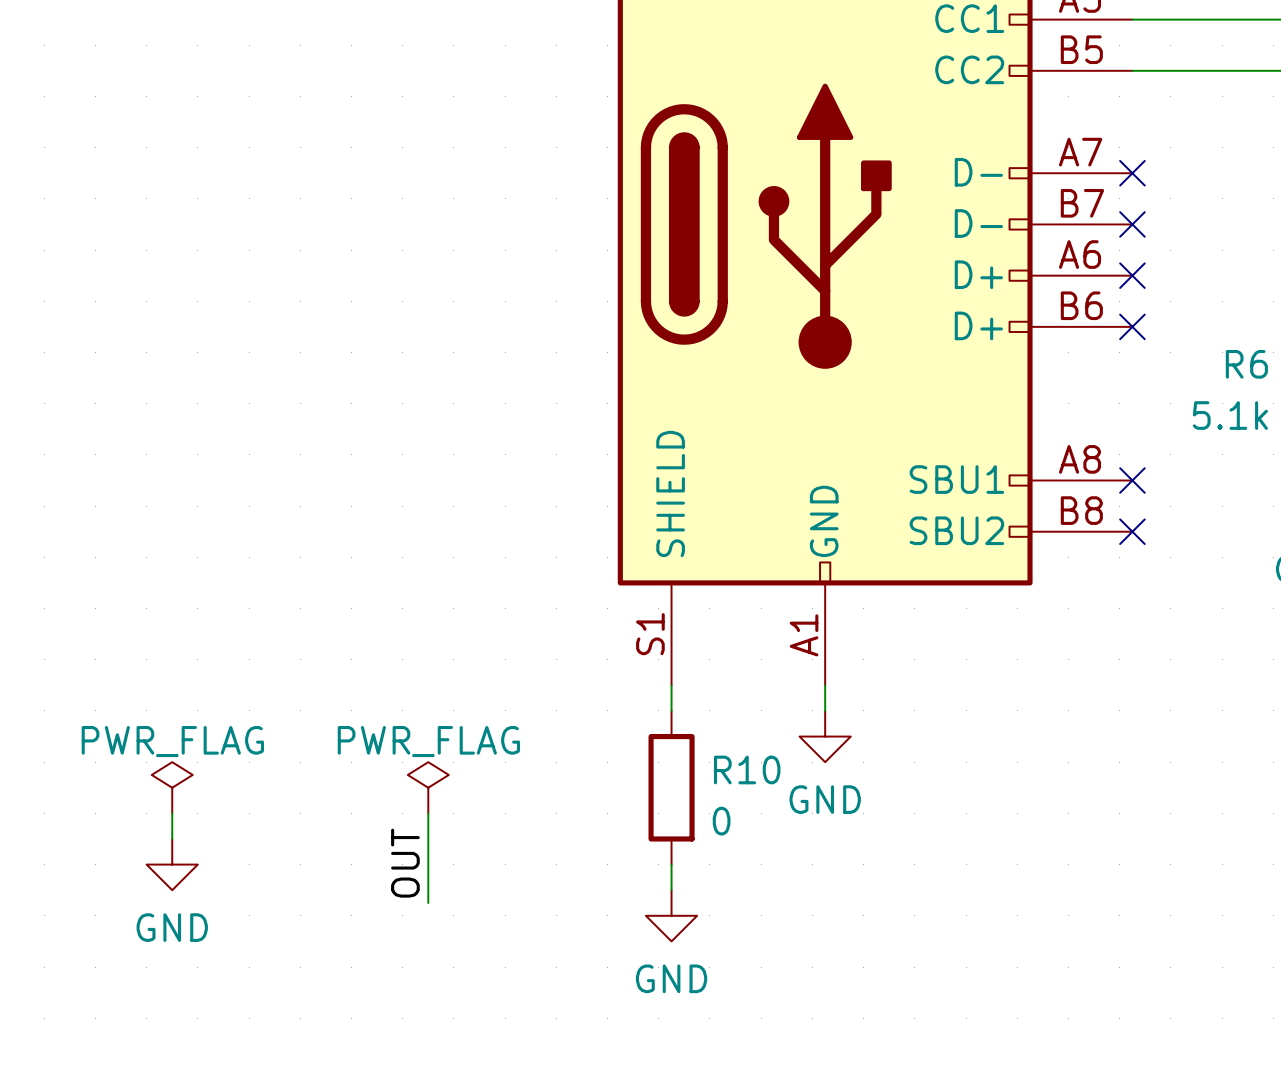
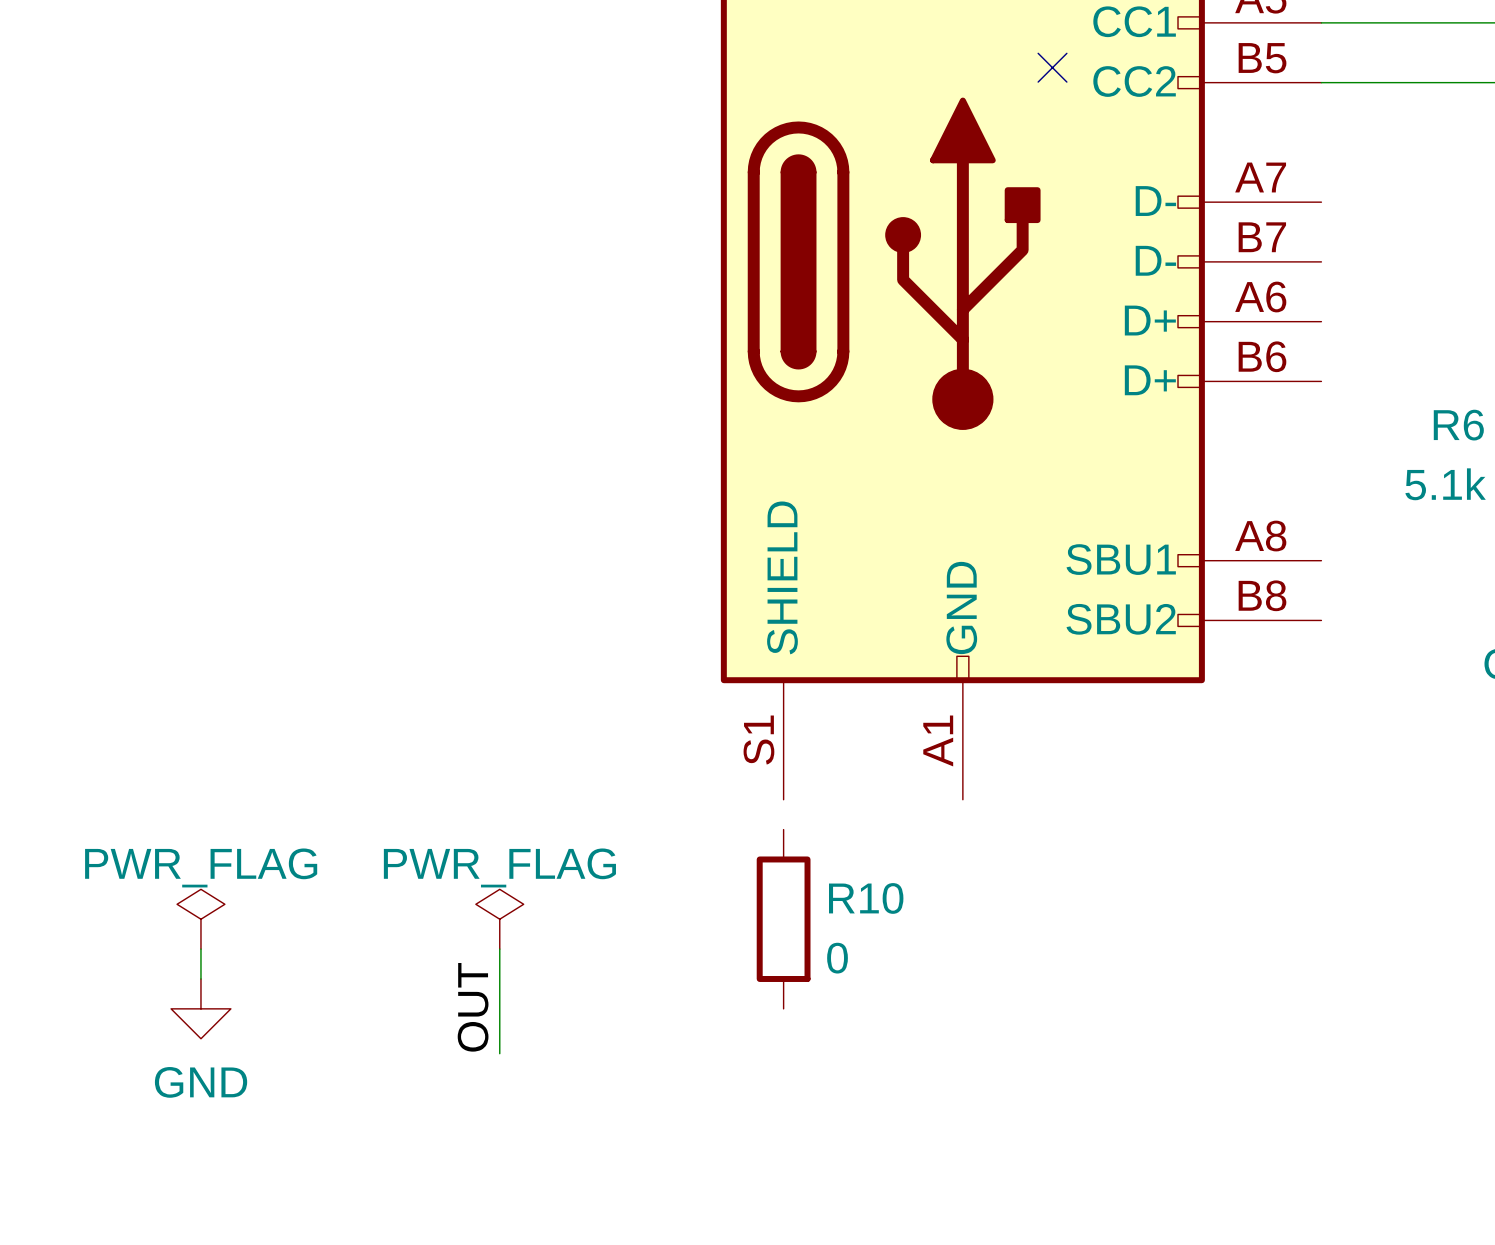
no-connect mark: none -> (1052, 67)
no-connect mark: (1132, 173) -> none
no-connect mark: (1132, 224) -> none
no-connect mark: (1132, 275) -> none
no-connect mark: (1132, 326) -> none
no-connect mark: (1132, 480) -> none
no-connect mark: (1132, 531) -> none
wire: (671, 685) (671, 710) -> none
wire: (825, 685) (825, 710) -> none
power symbol: GND (825, 736) -> none
wire: (671, 864) (671, 890) -> none
power symbol: GND (671, 915) -> none

